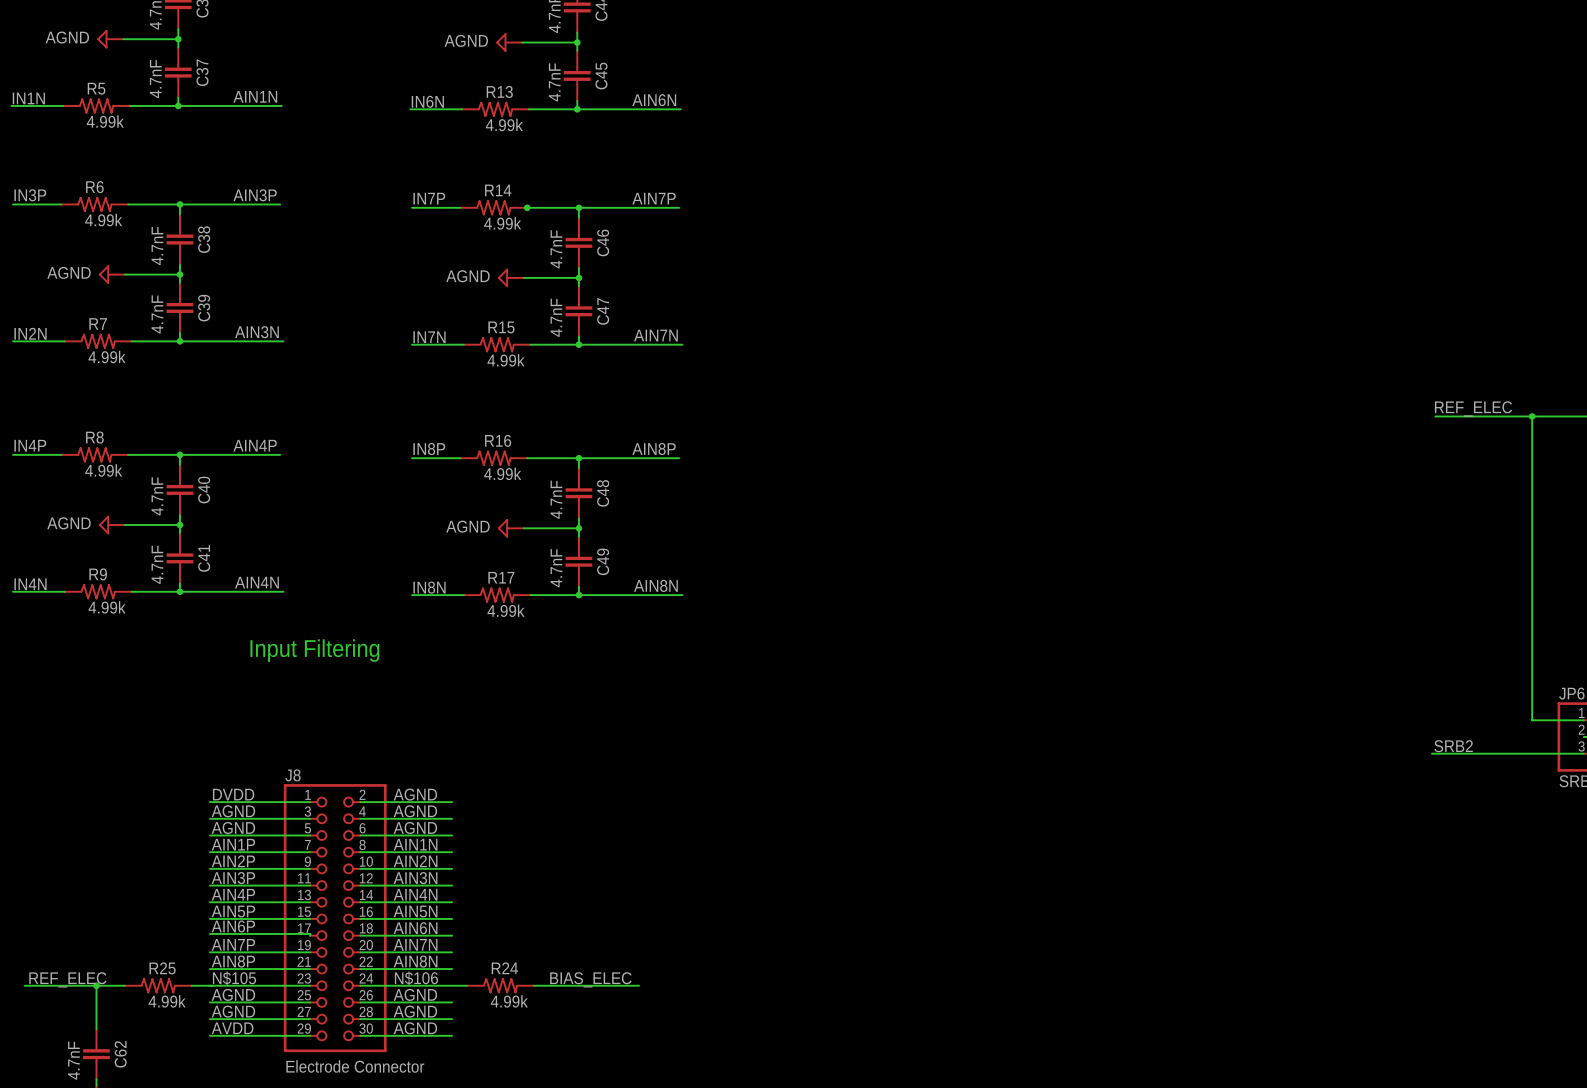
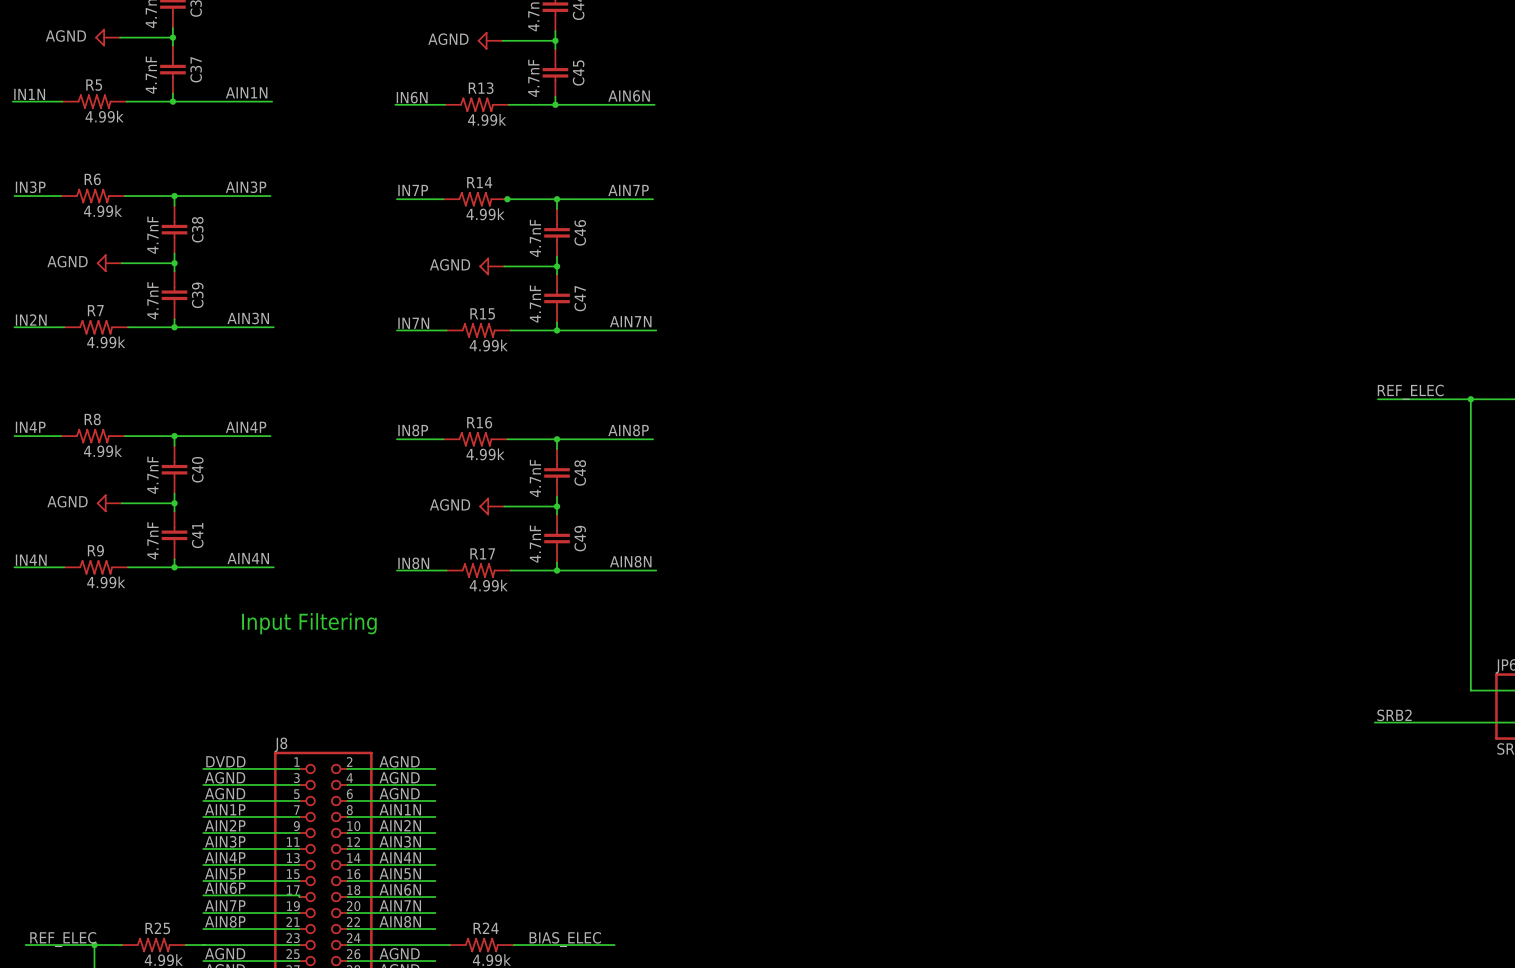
label: N$105 (234, 978) -> none
label: N$106 (416, 978) -> none

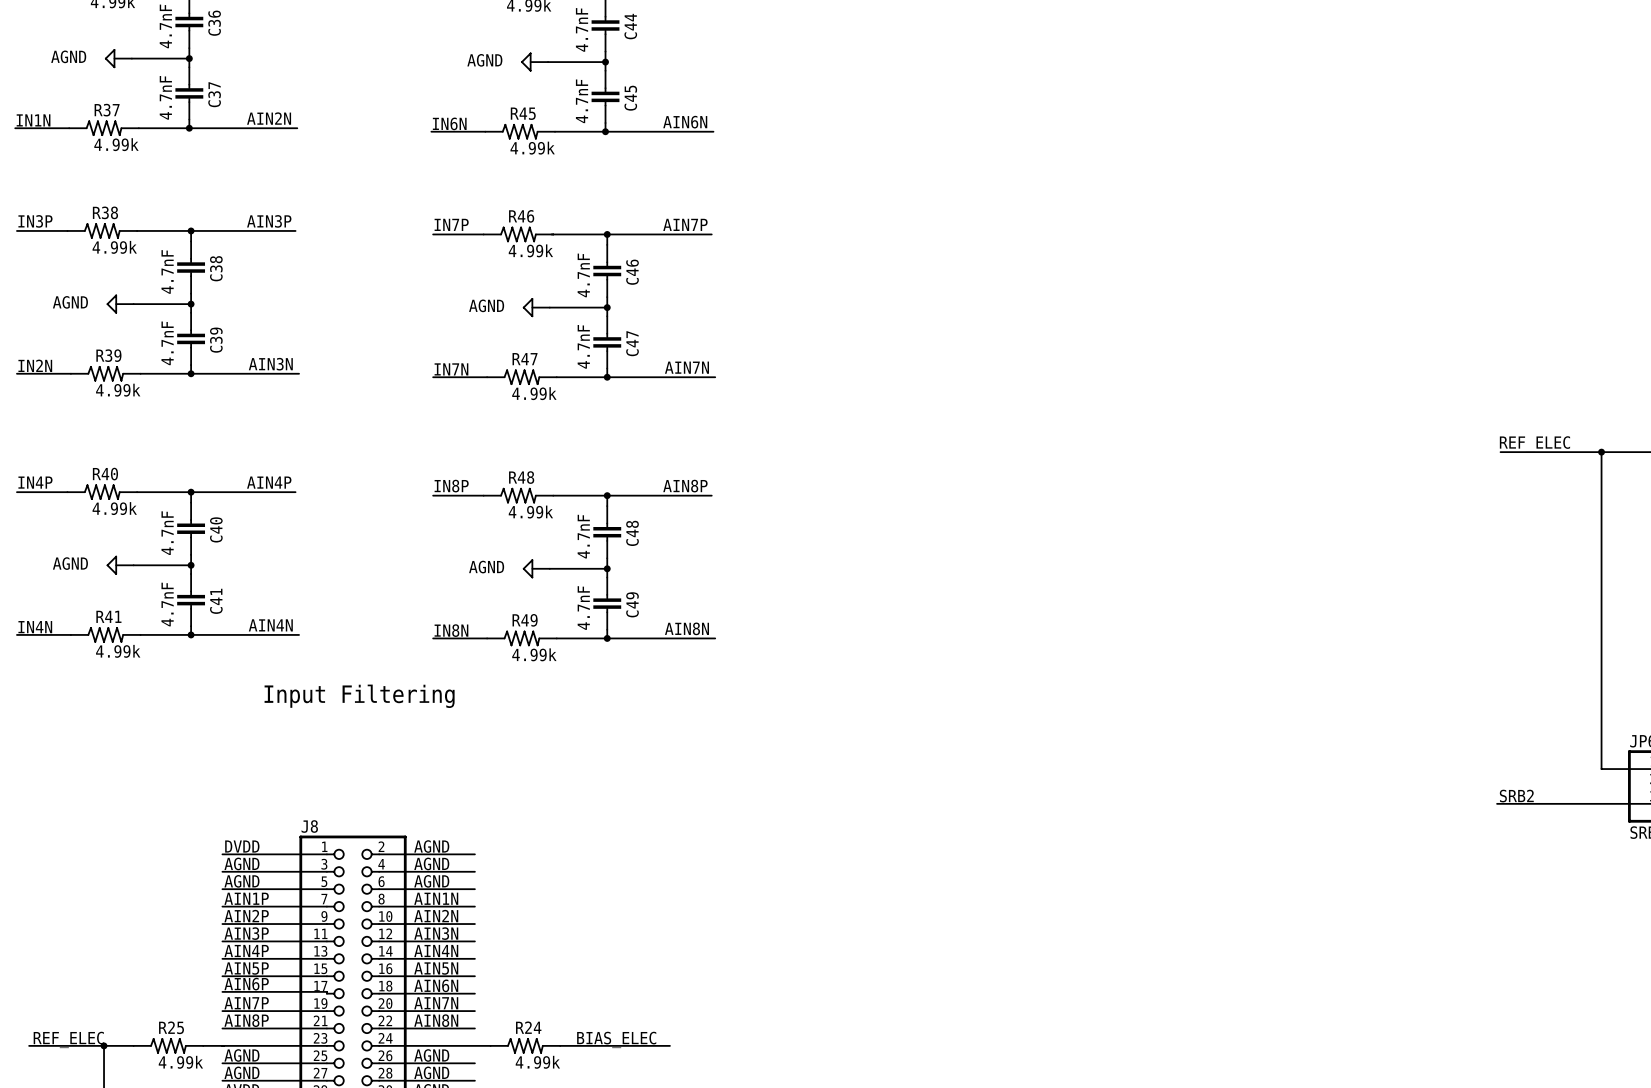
R5 name: R5 (94, 85) -> R37 (107, 110)
R13 name: R13 (481, 88) -> R45 (523, 113)
label: AIN1N (246, 92) -> AIN2N (269, 118)
R6 name: R6 (92, 179) -> R38 (105, 212)
R14 name: R14 (479, 182) -> R46 (521, 216)
junction: (507, 199) -> none
R7 name: R7 (95, 310) -> R39 (108, 355)
R15 name: R15 (482, 313) -> R47 (525, 359)
R8 name: R8 (92, 419) -> R40 (105, 474)
R16 name: R16 (479, 422) -> R48 (521, 477)
R9 name: R9 (95, 550) -> R41 (108, 616)
R17 name: R17 (482, 553) -> R49 (525, 620)

